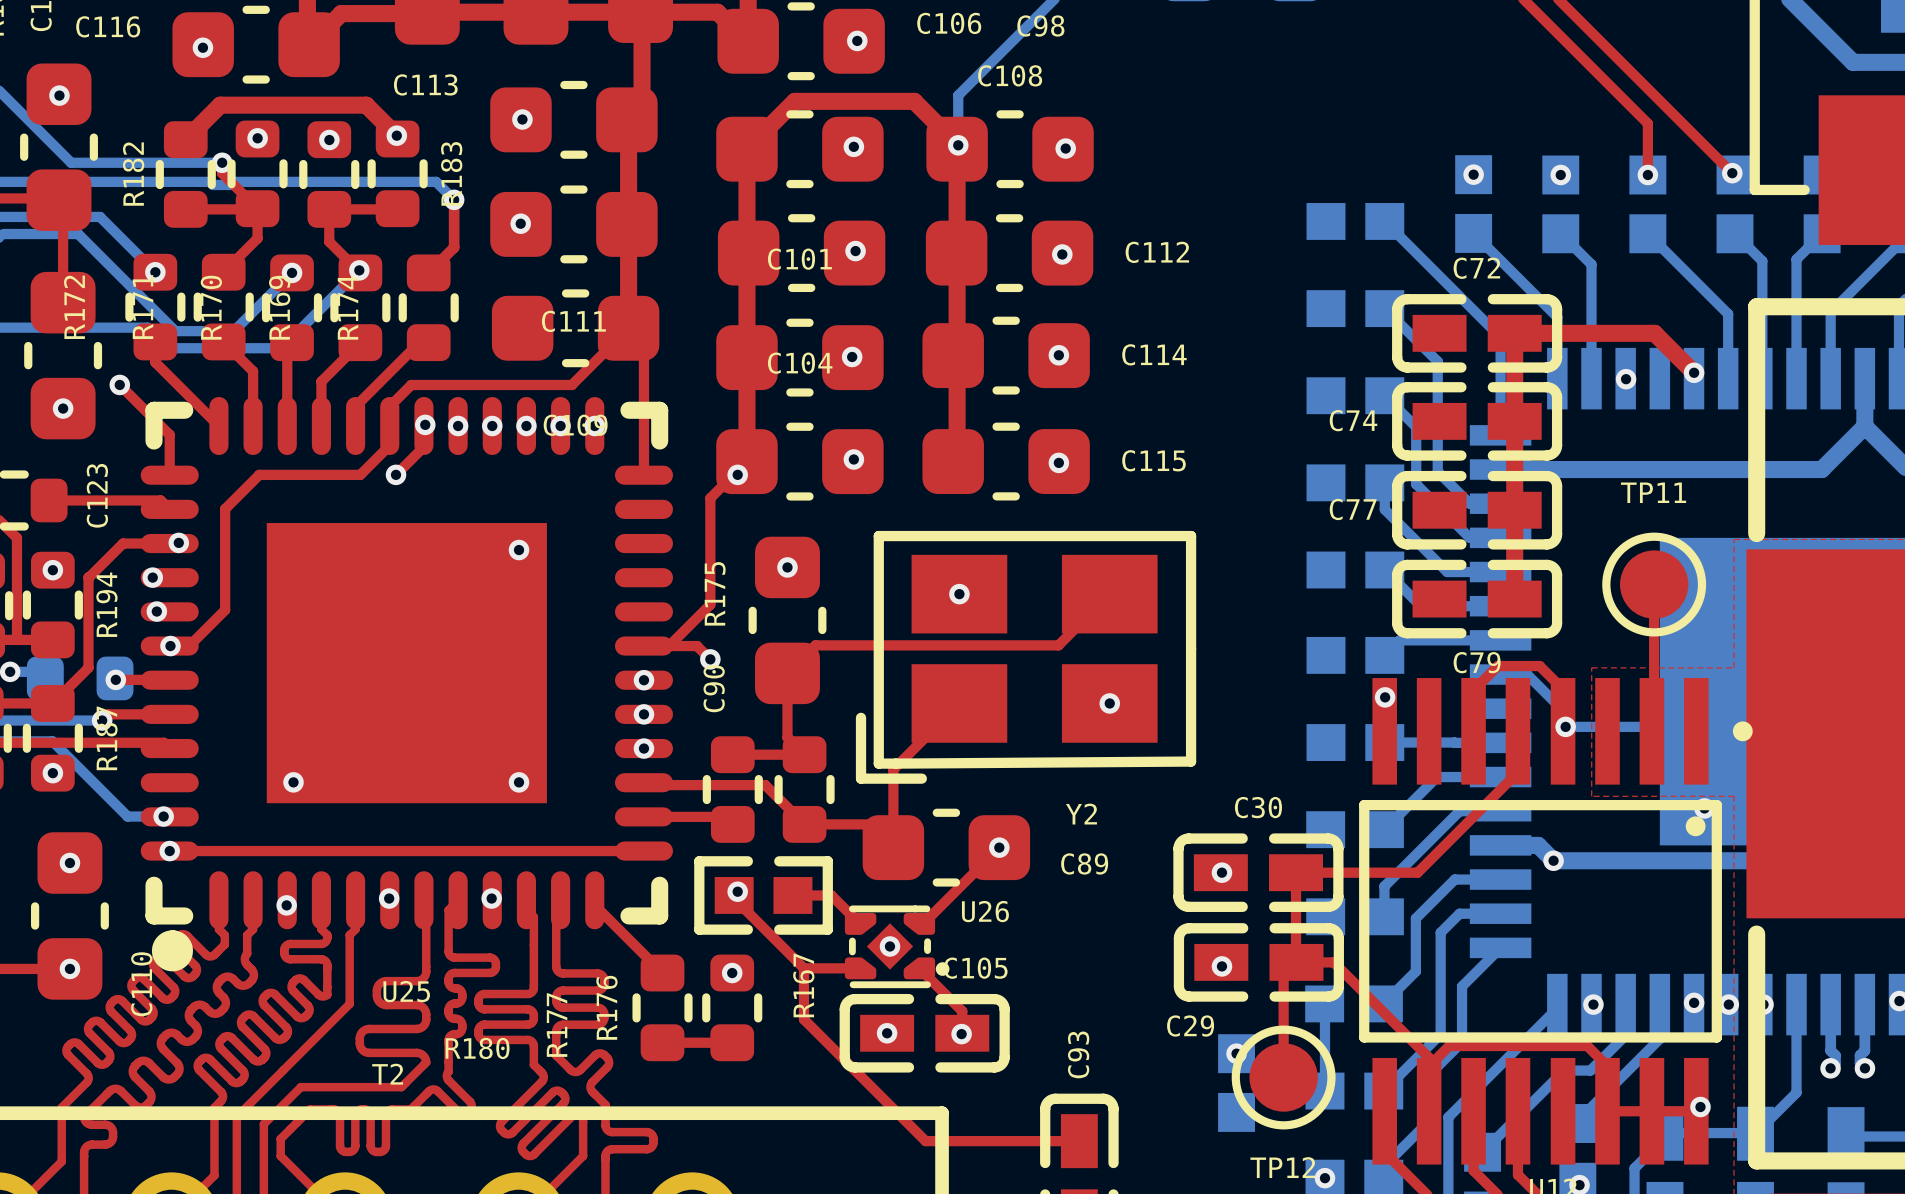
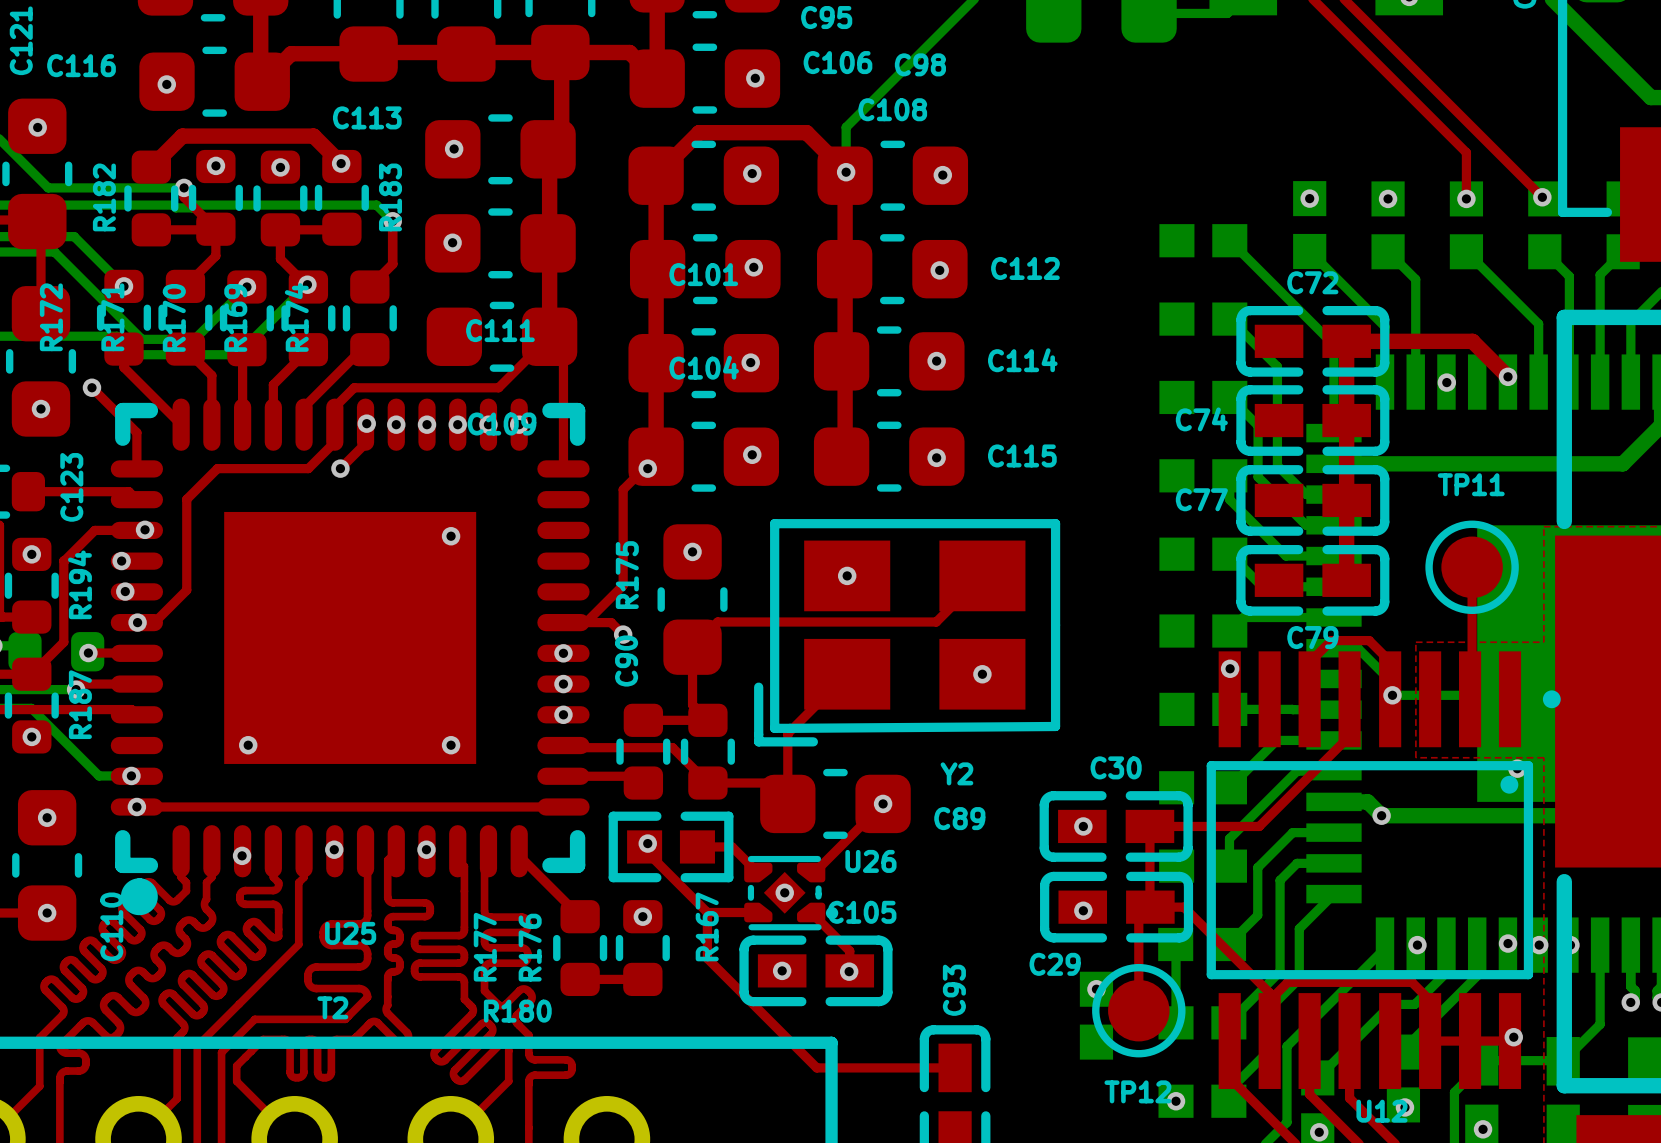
R177 name position: R177 (557, 1025) -> R177 (485, 947)
R180 name position: R180 (477, 1048) -> R180 (517, 1011)

